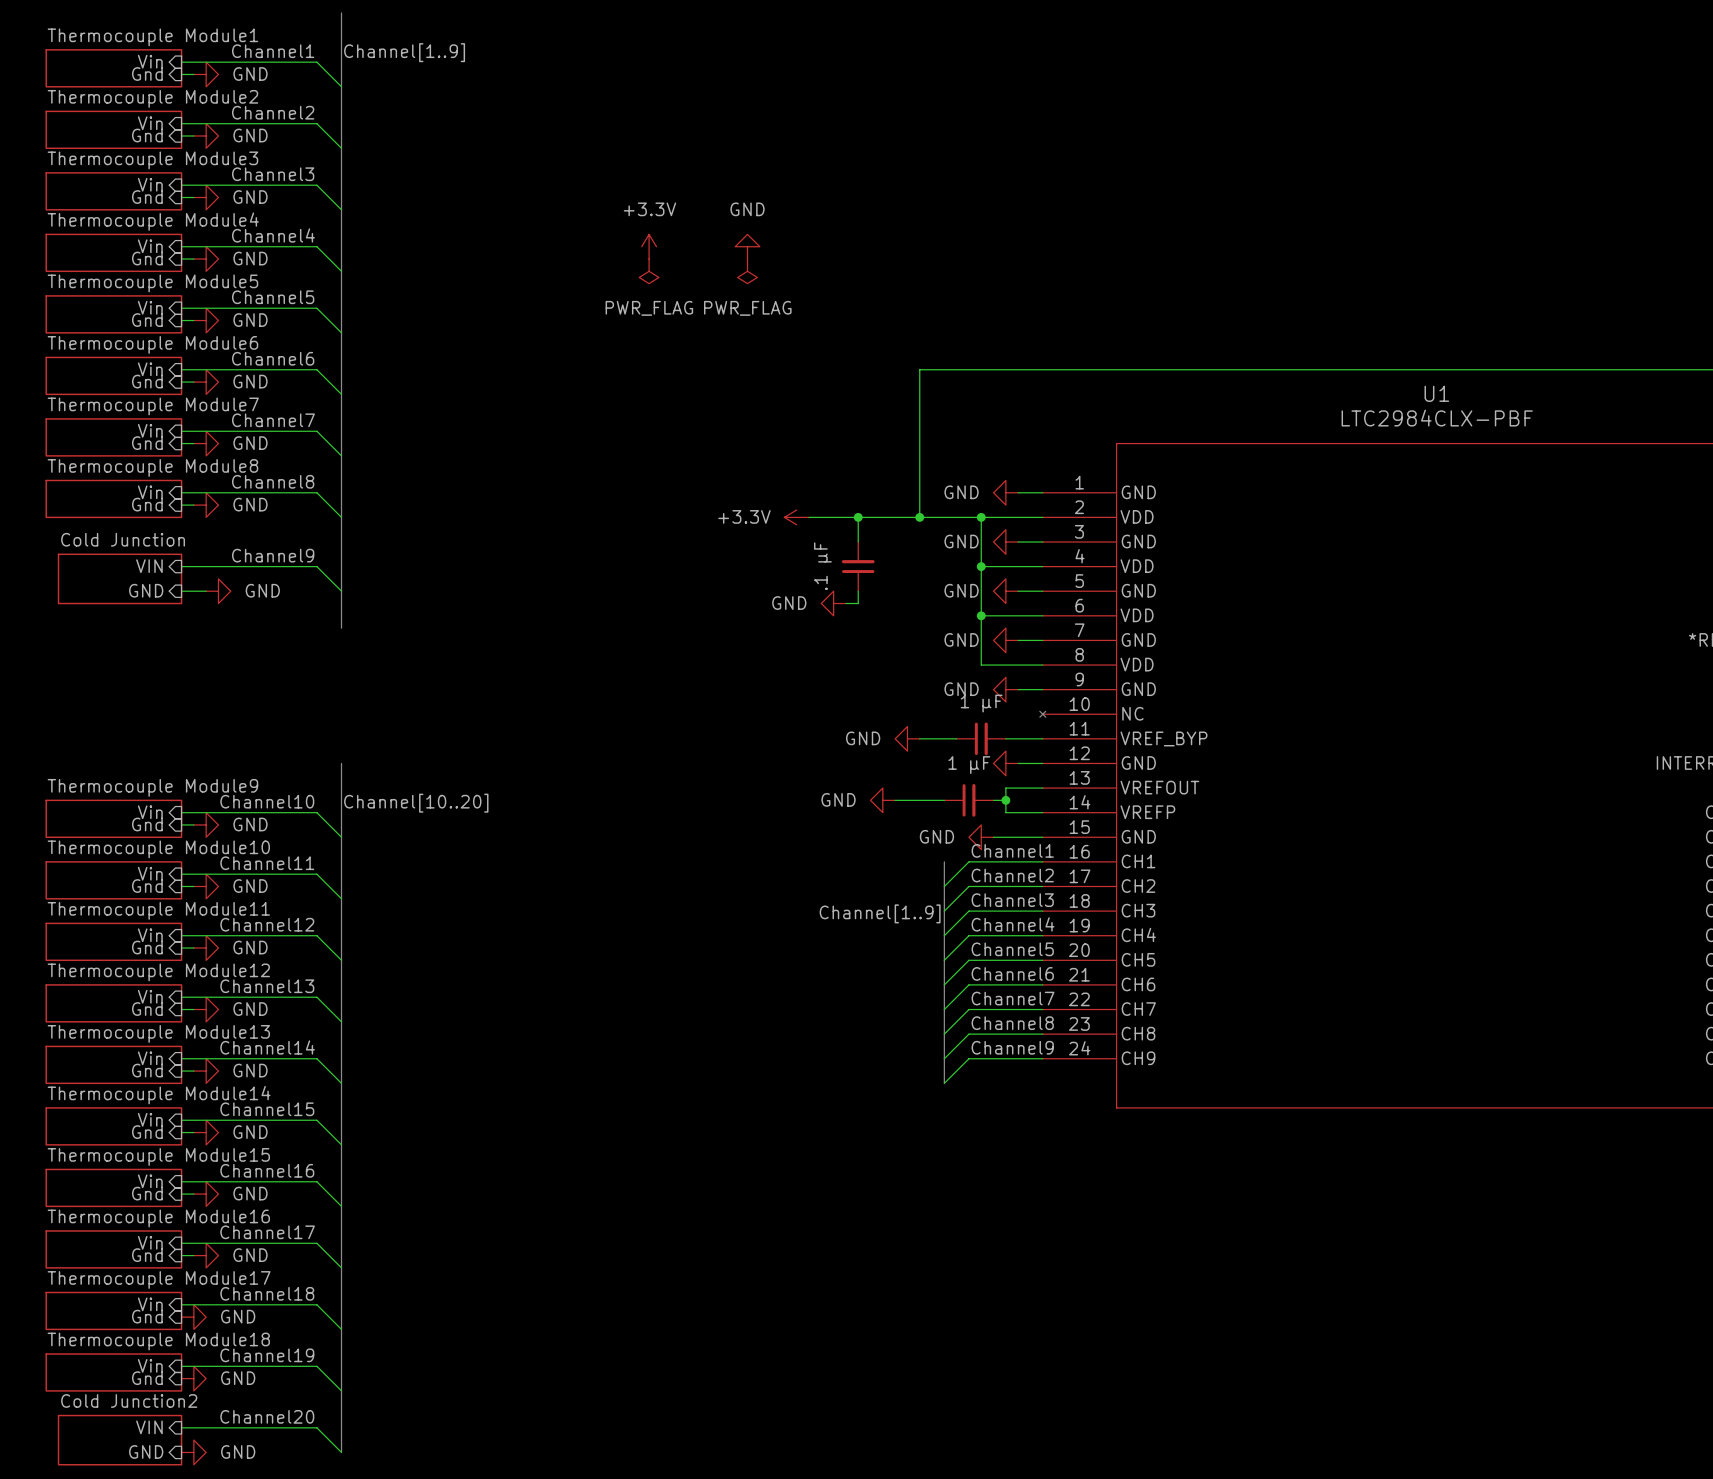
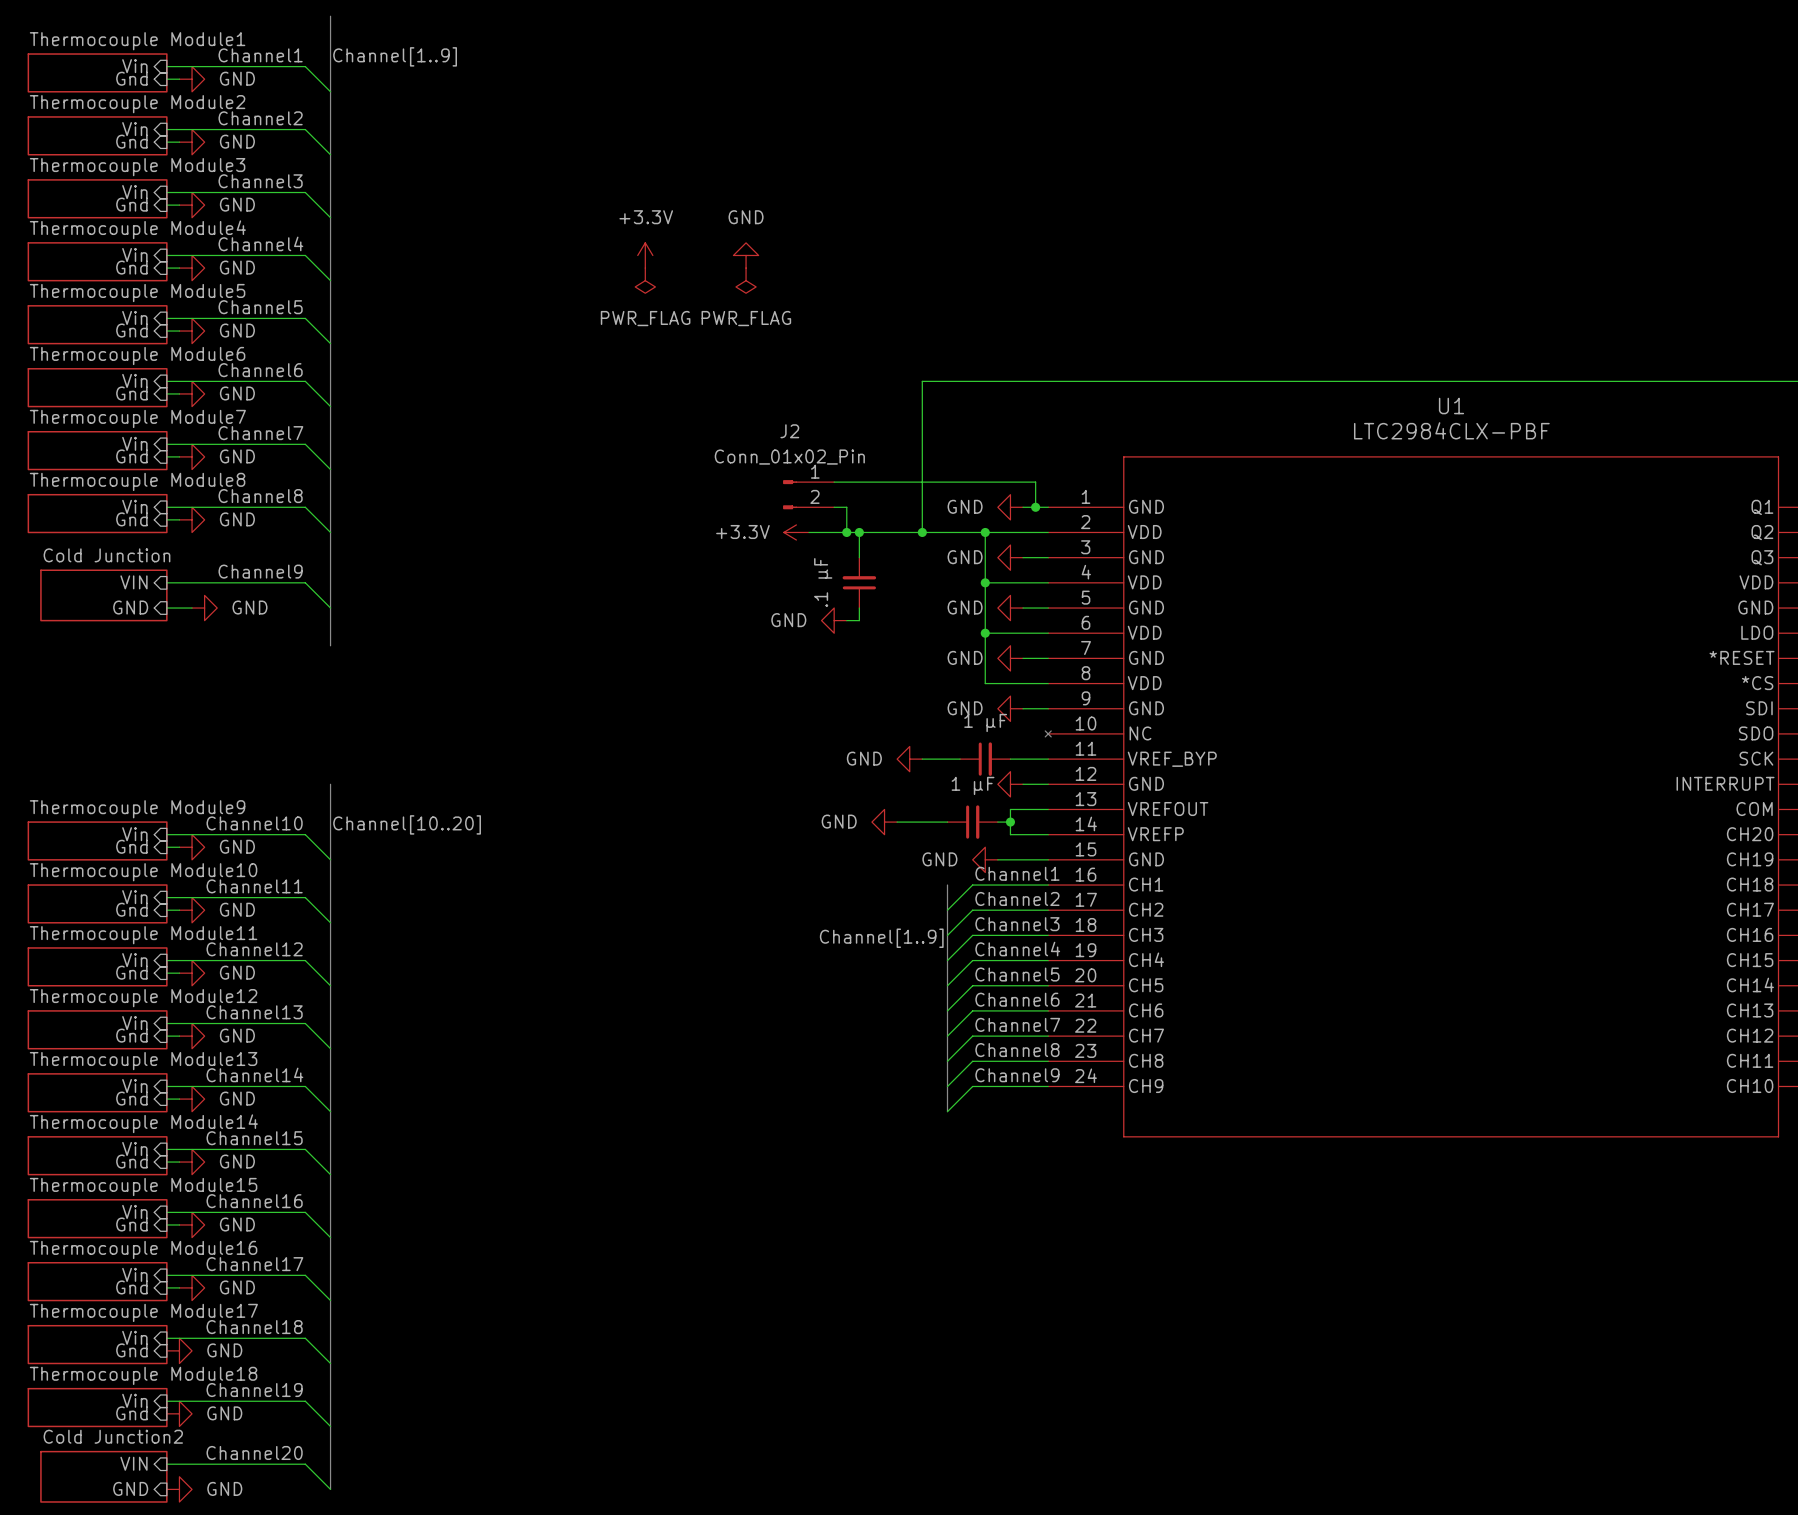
wire: none -> (834, 482) (1035, 482) (1035, 507)
J2: none -> Conn_01x02_Pin (808, 494)
wire: none -> (834, 507) (846, 507) (846, 532)
junction: none -> (1035, 507)
junction: none -> (846, 532)

